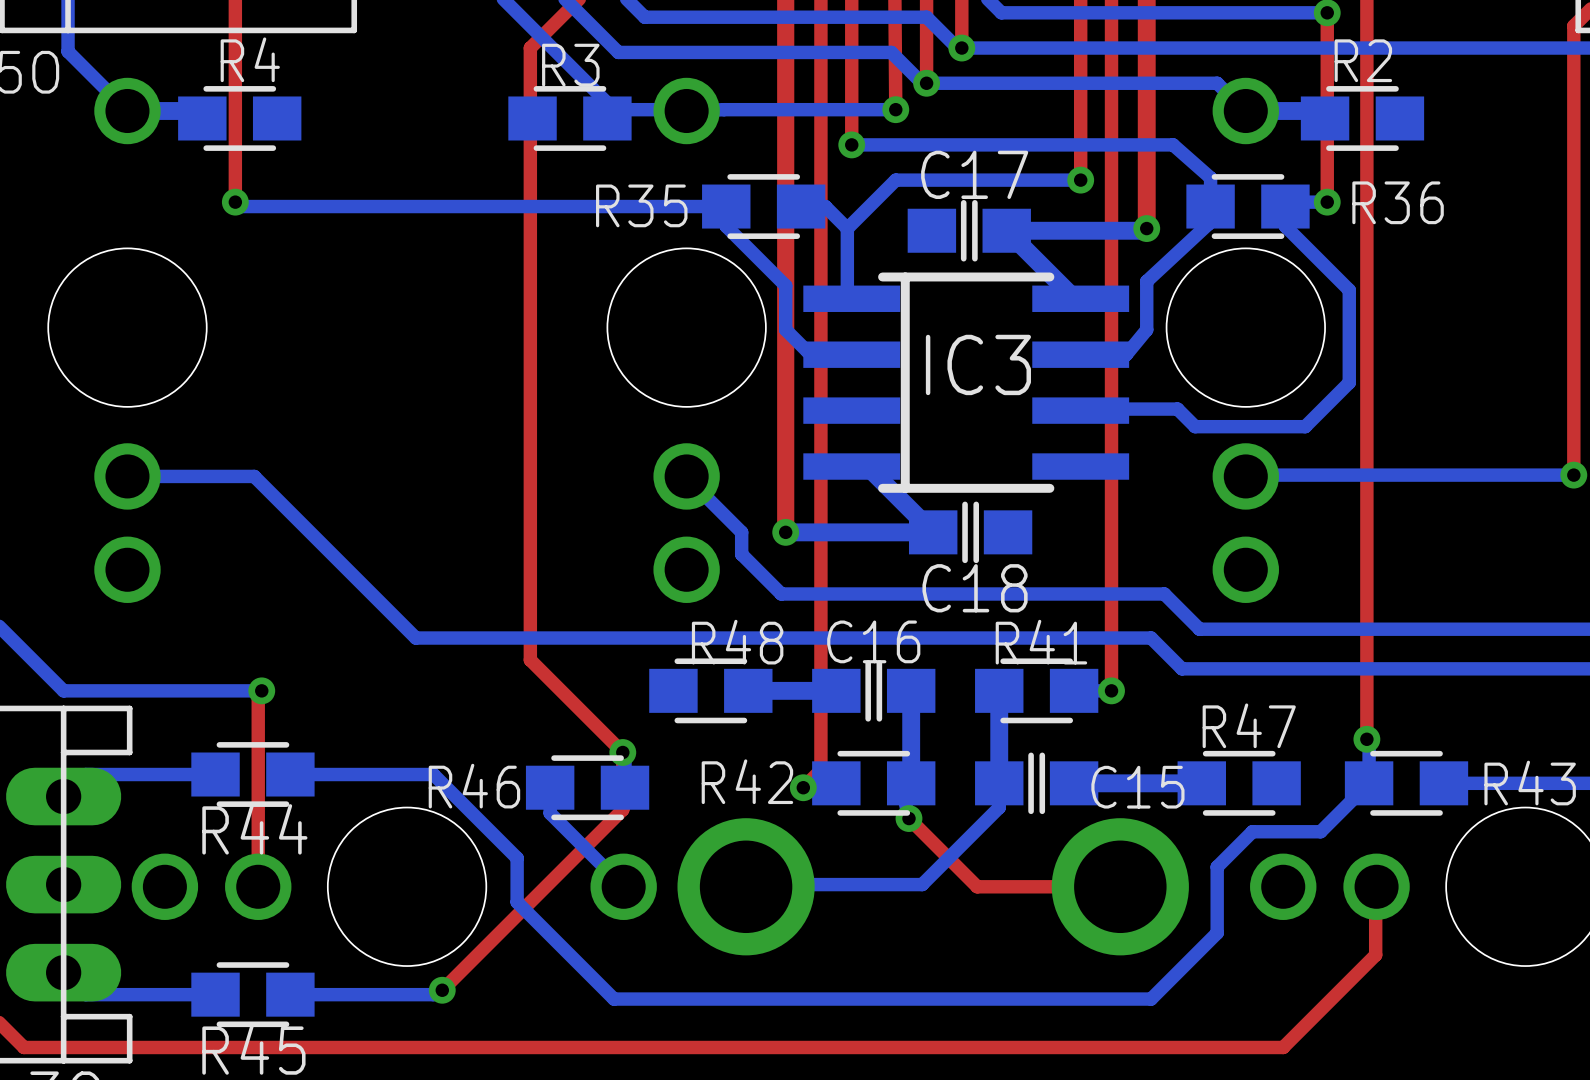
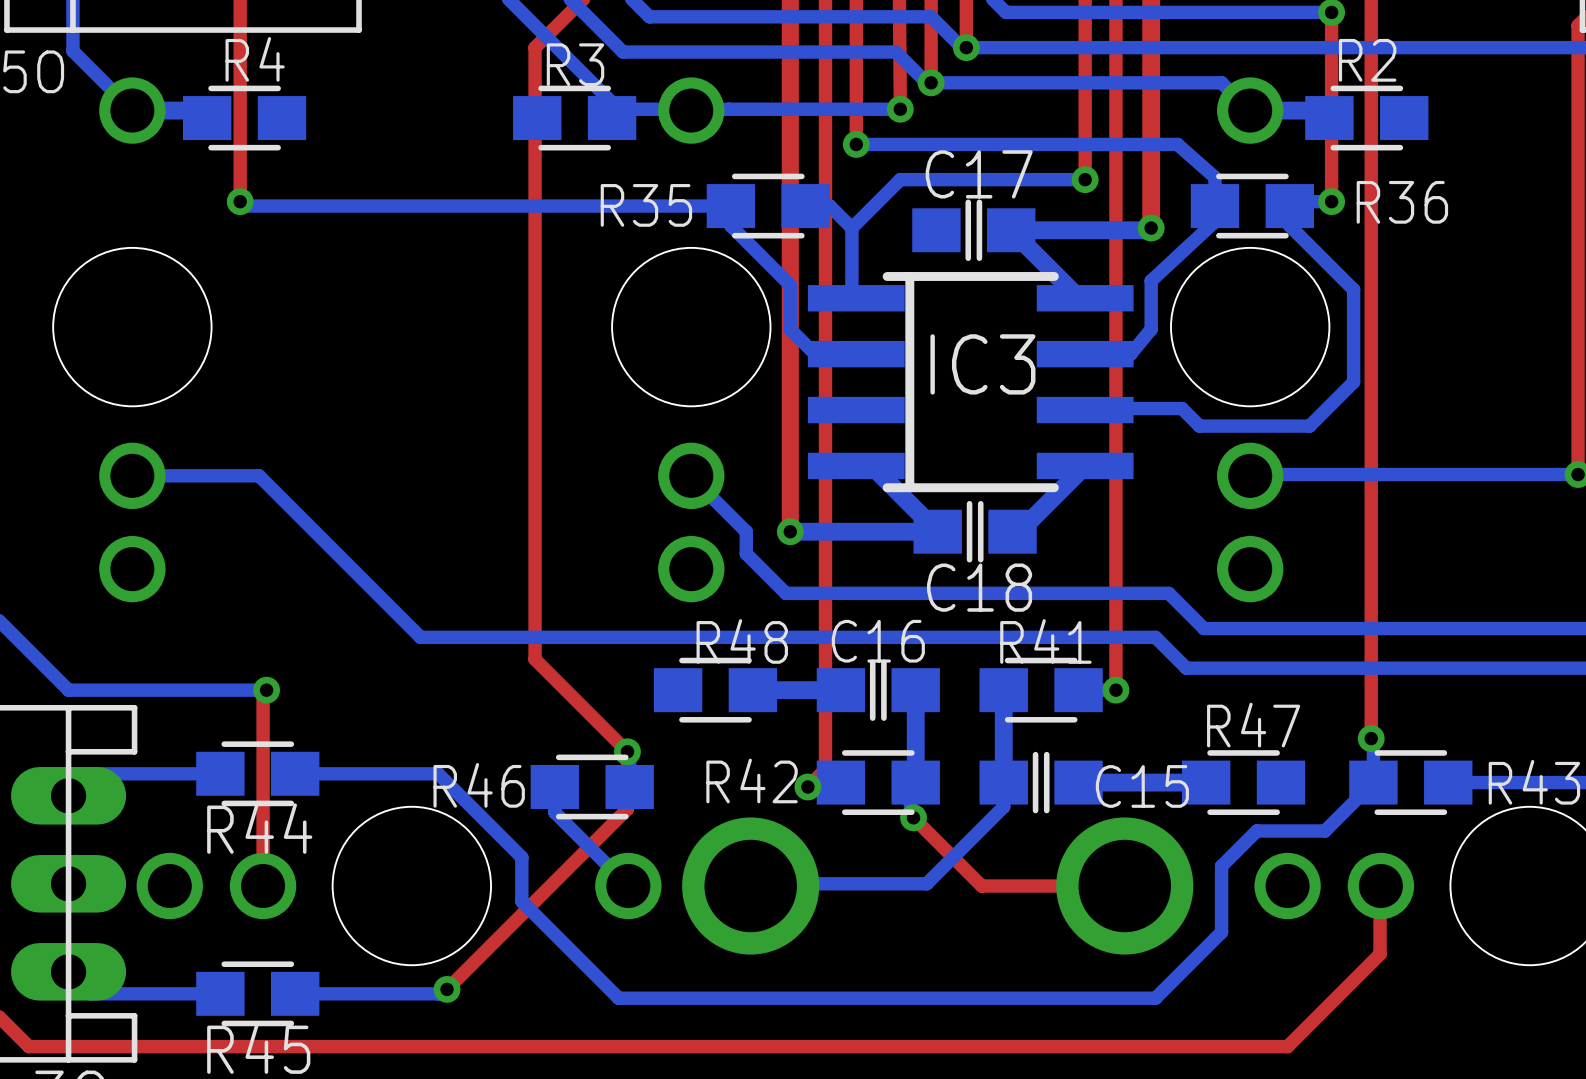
bottom track: none -> (1085, 465) (1019, 531) (1012, 531)

